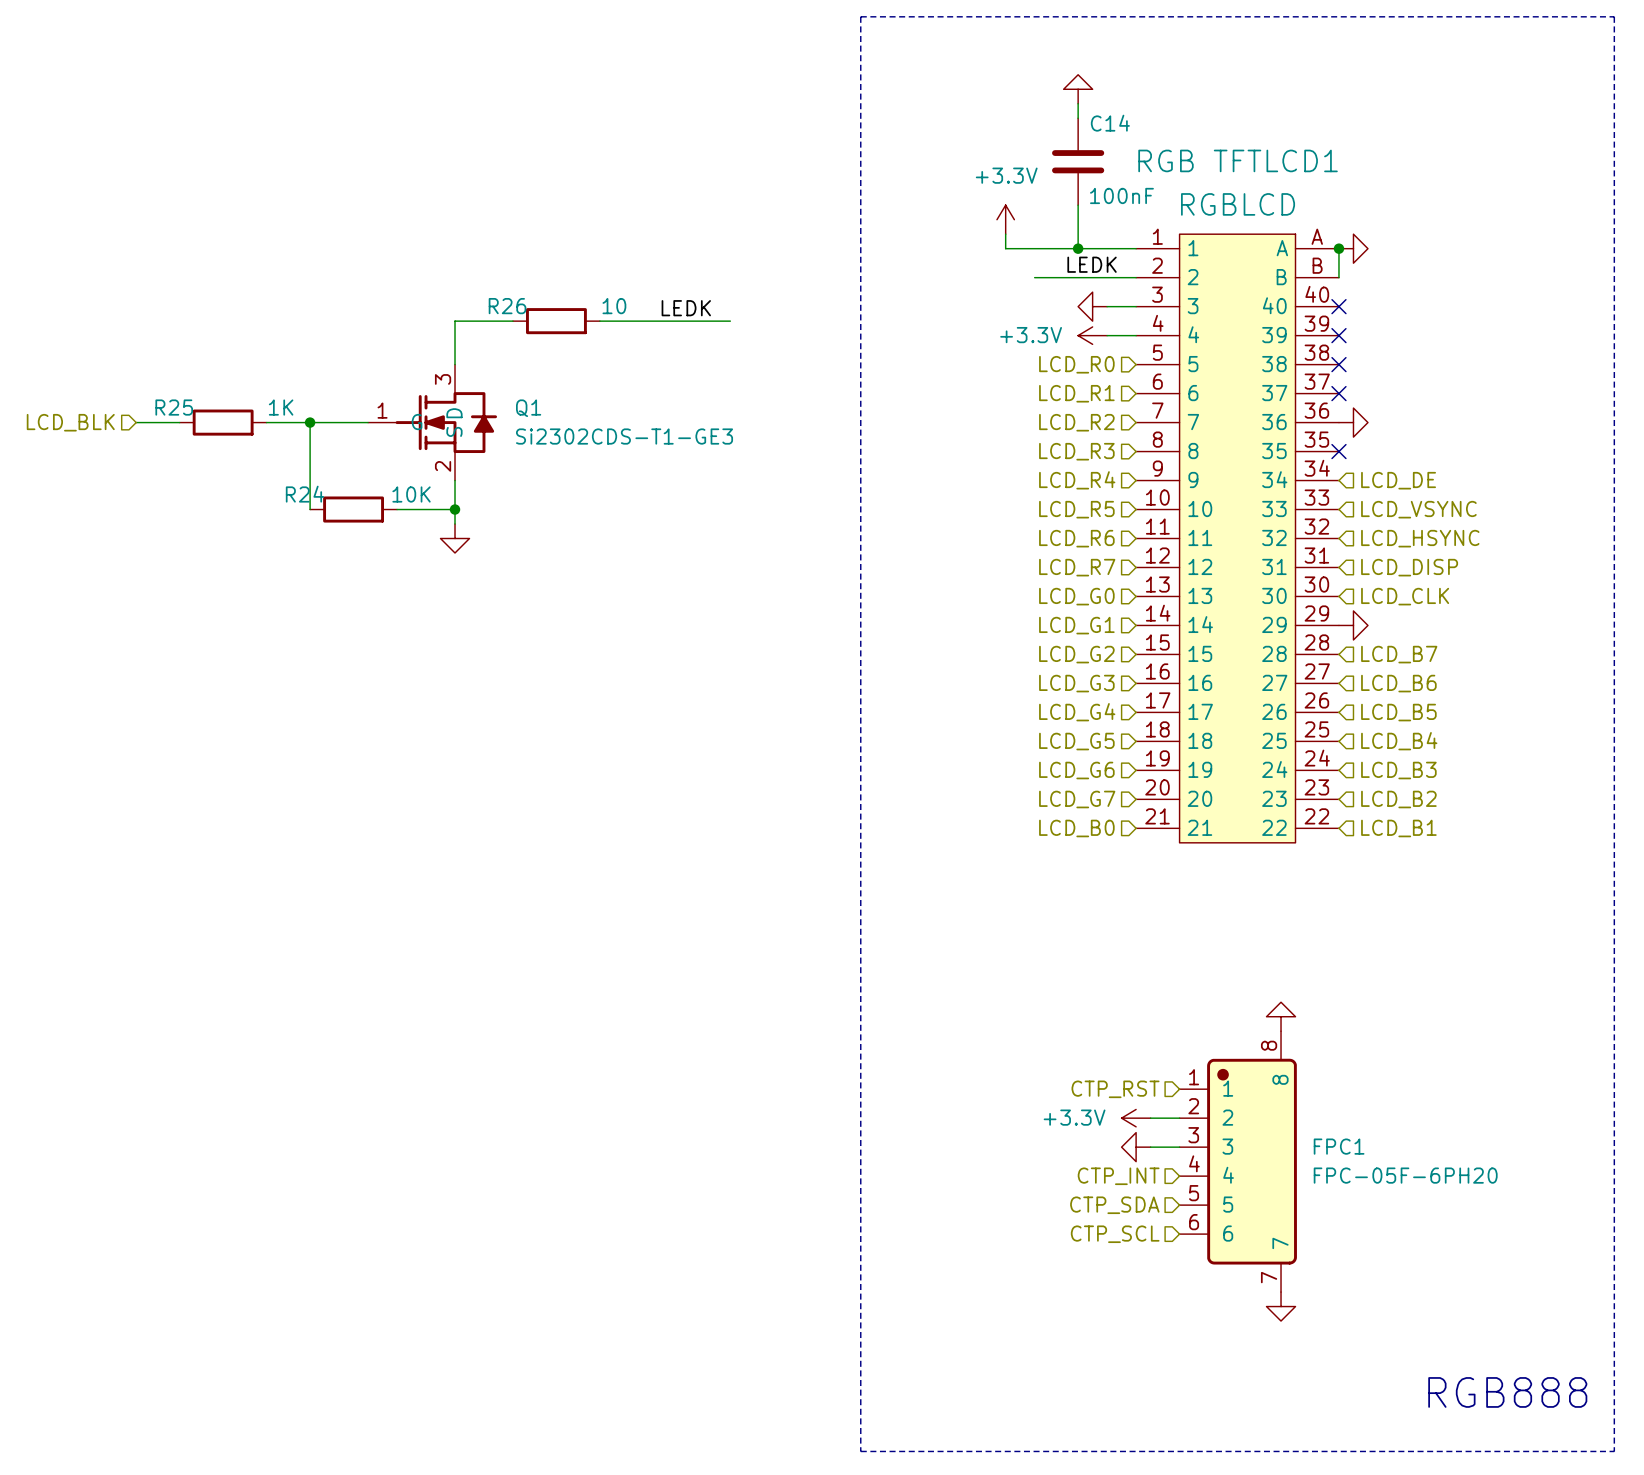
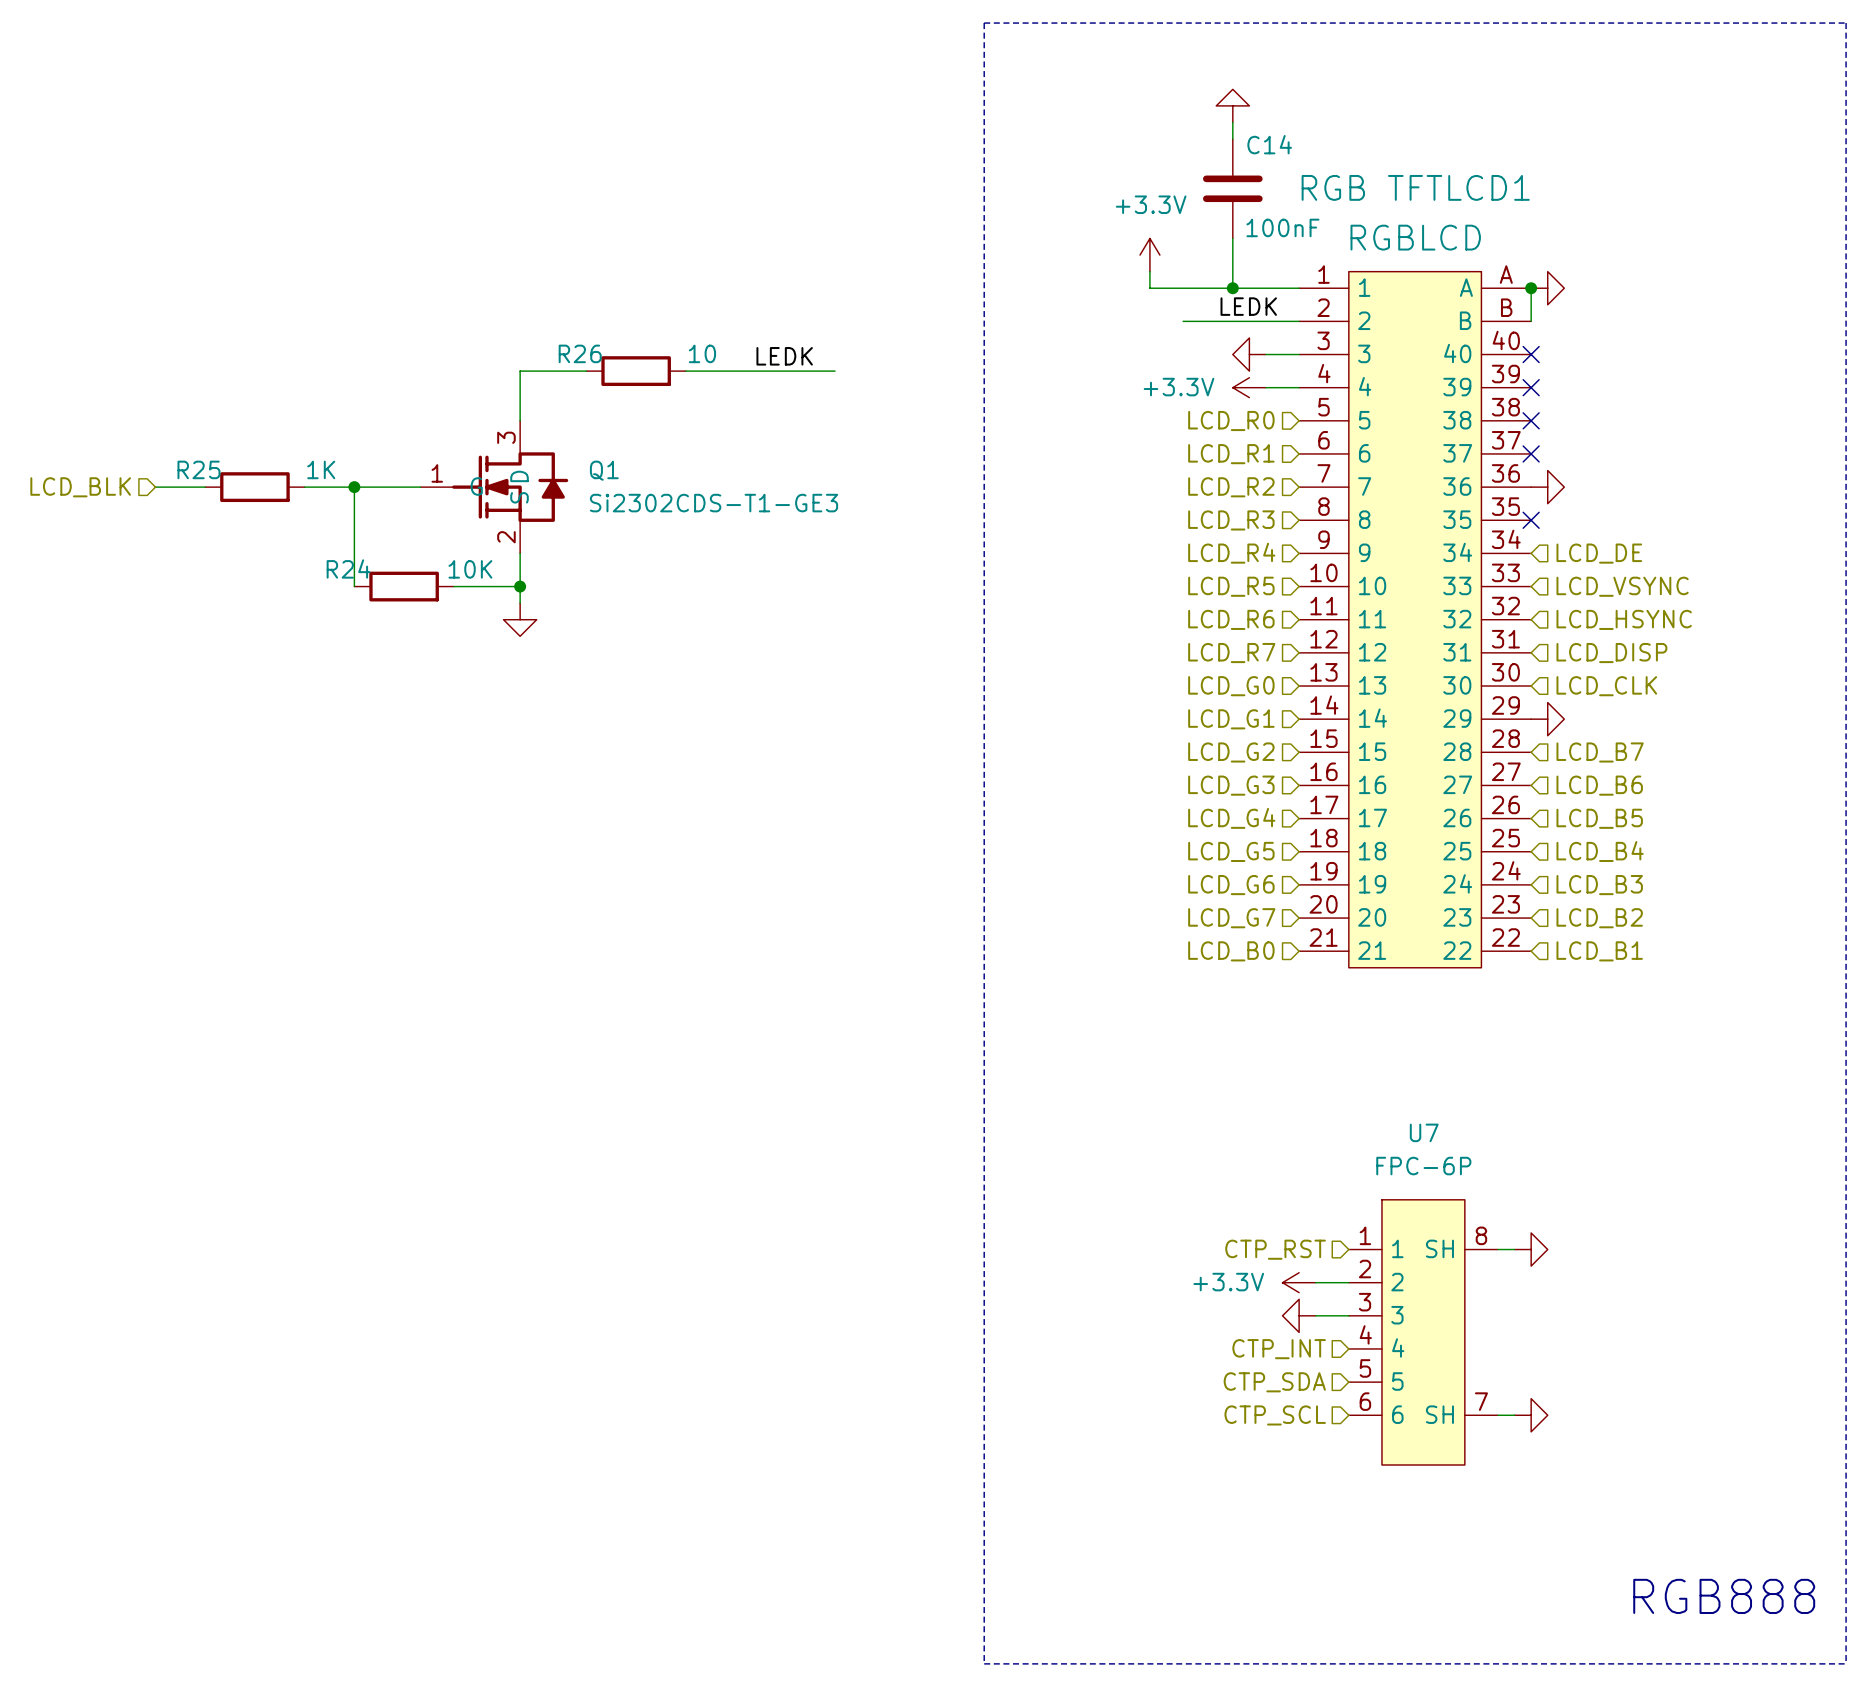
power symbol rotation: 0° (1281, 1016) -> 90° clockwise (1531, 1249)
power symbol position: (1281, 1016) -> (1531, 1249)
wire: none -> (1498, 1249) (1514, 1249)
FPC1: FPC-05F-6PH20 (1238, 1161) -> none
U7: none -> FPC-6P (1423, 1332)
wire: none -> (1498, 1415) (1514, 1415)
power symbol rotation: 0° (1281, 1306) -> 90° counterclockwise (1531, 1415)
power symbol position: (1281, 1306) -> (1531, 1415)

